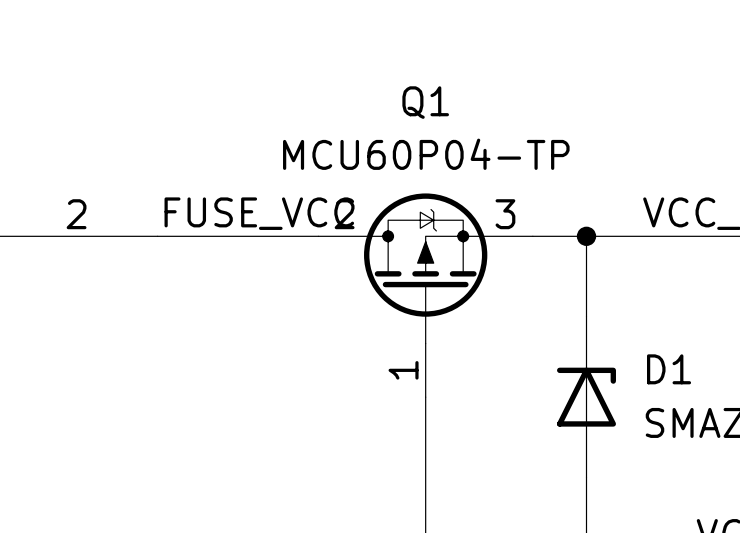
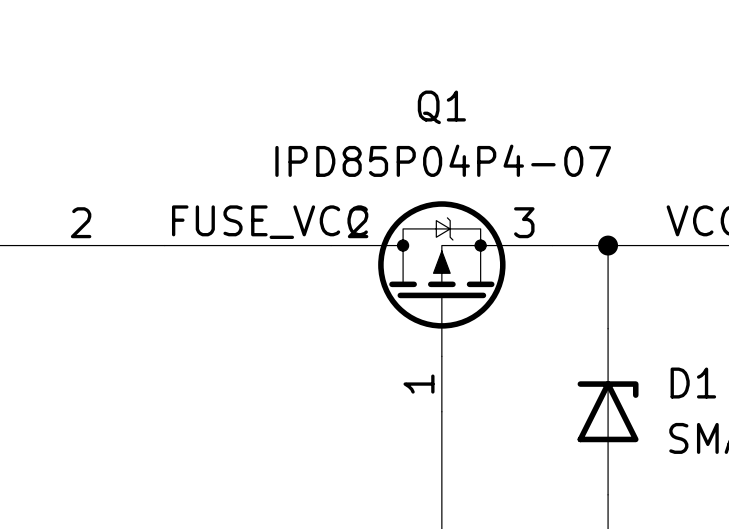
Q1 value: MCU60P04-TP (426, 154) -> IPD85P04P4-07 (443, 160)

